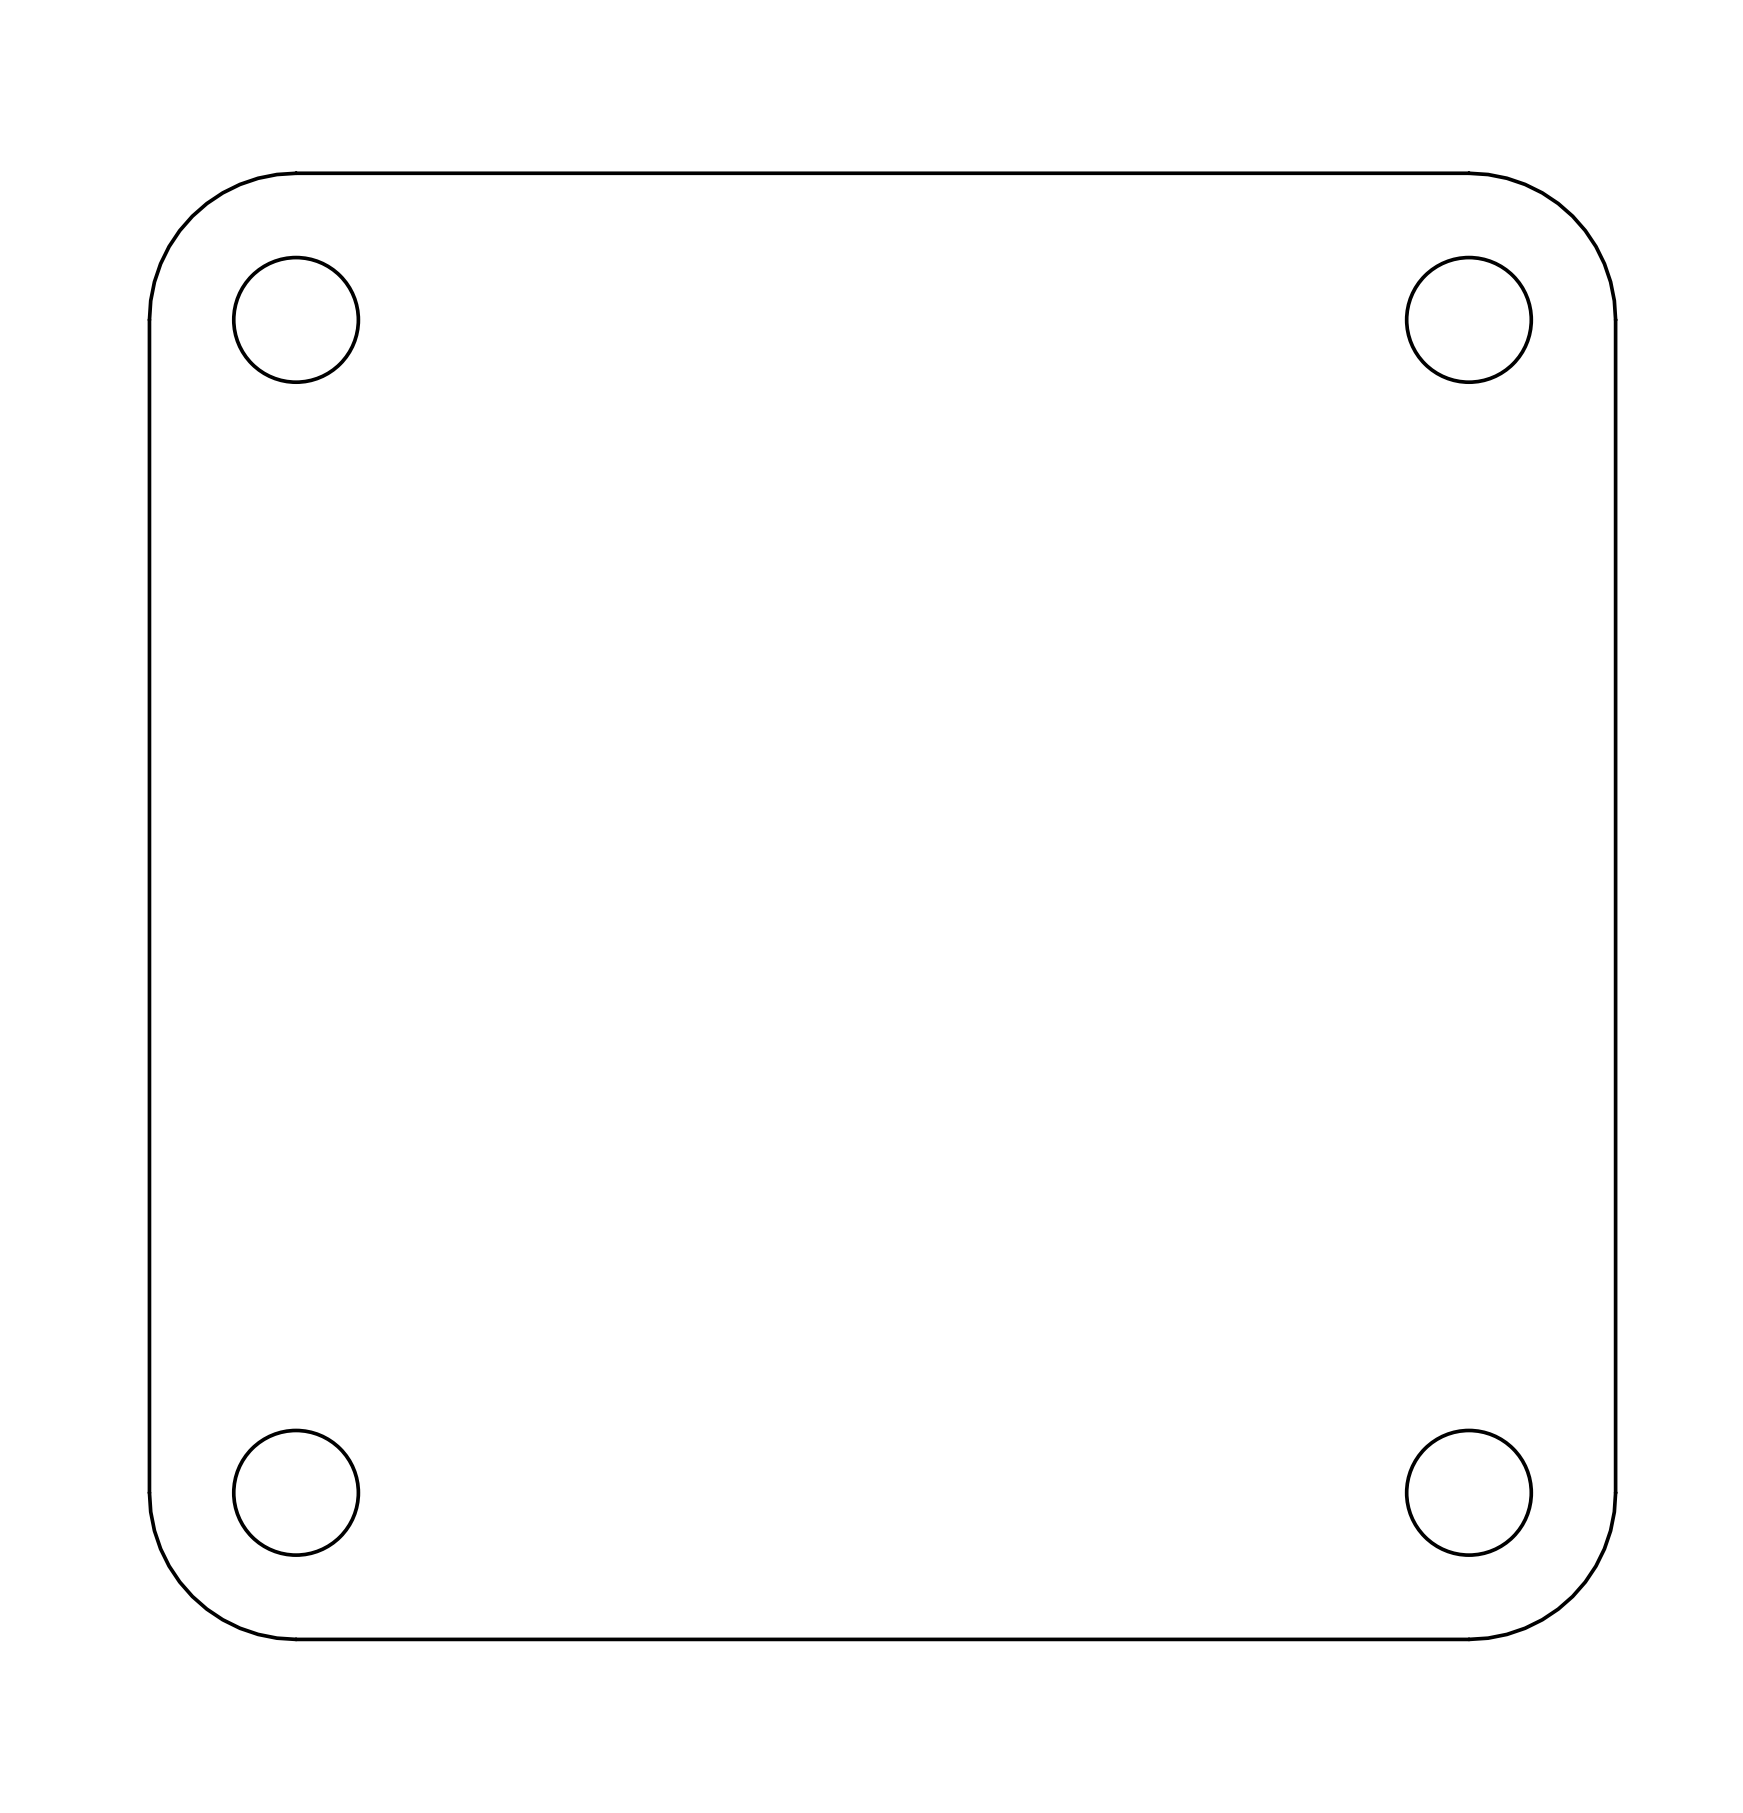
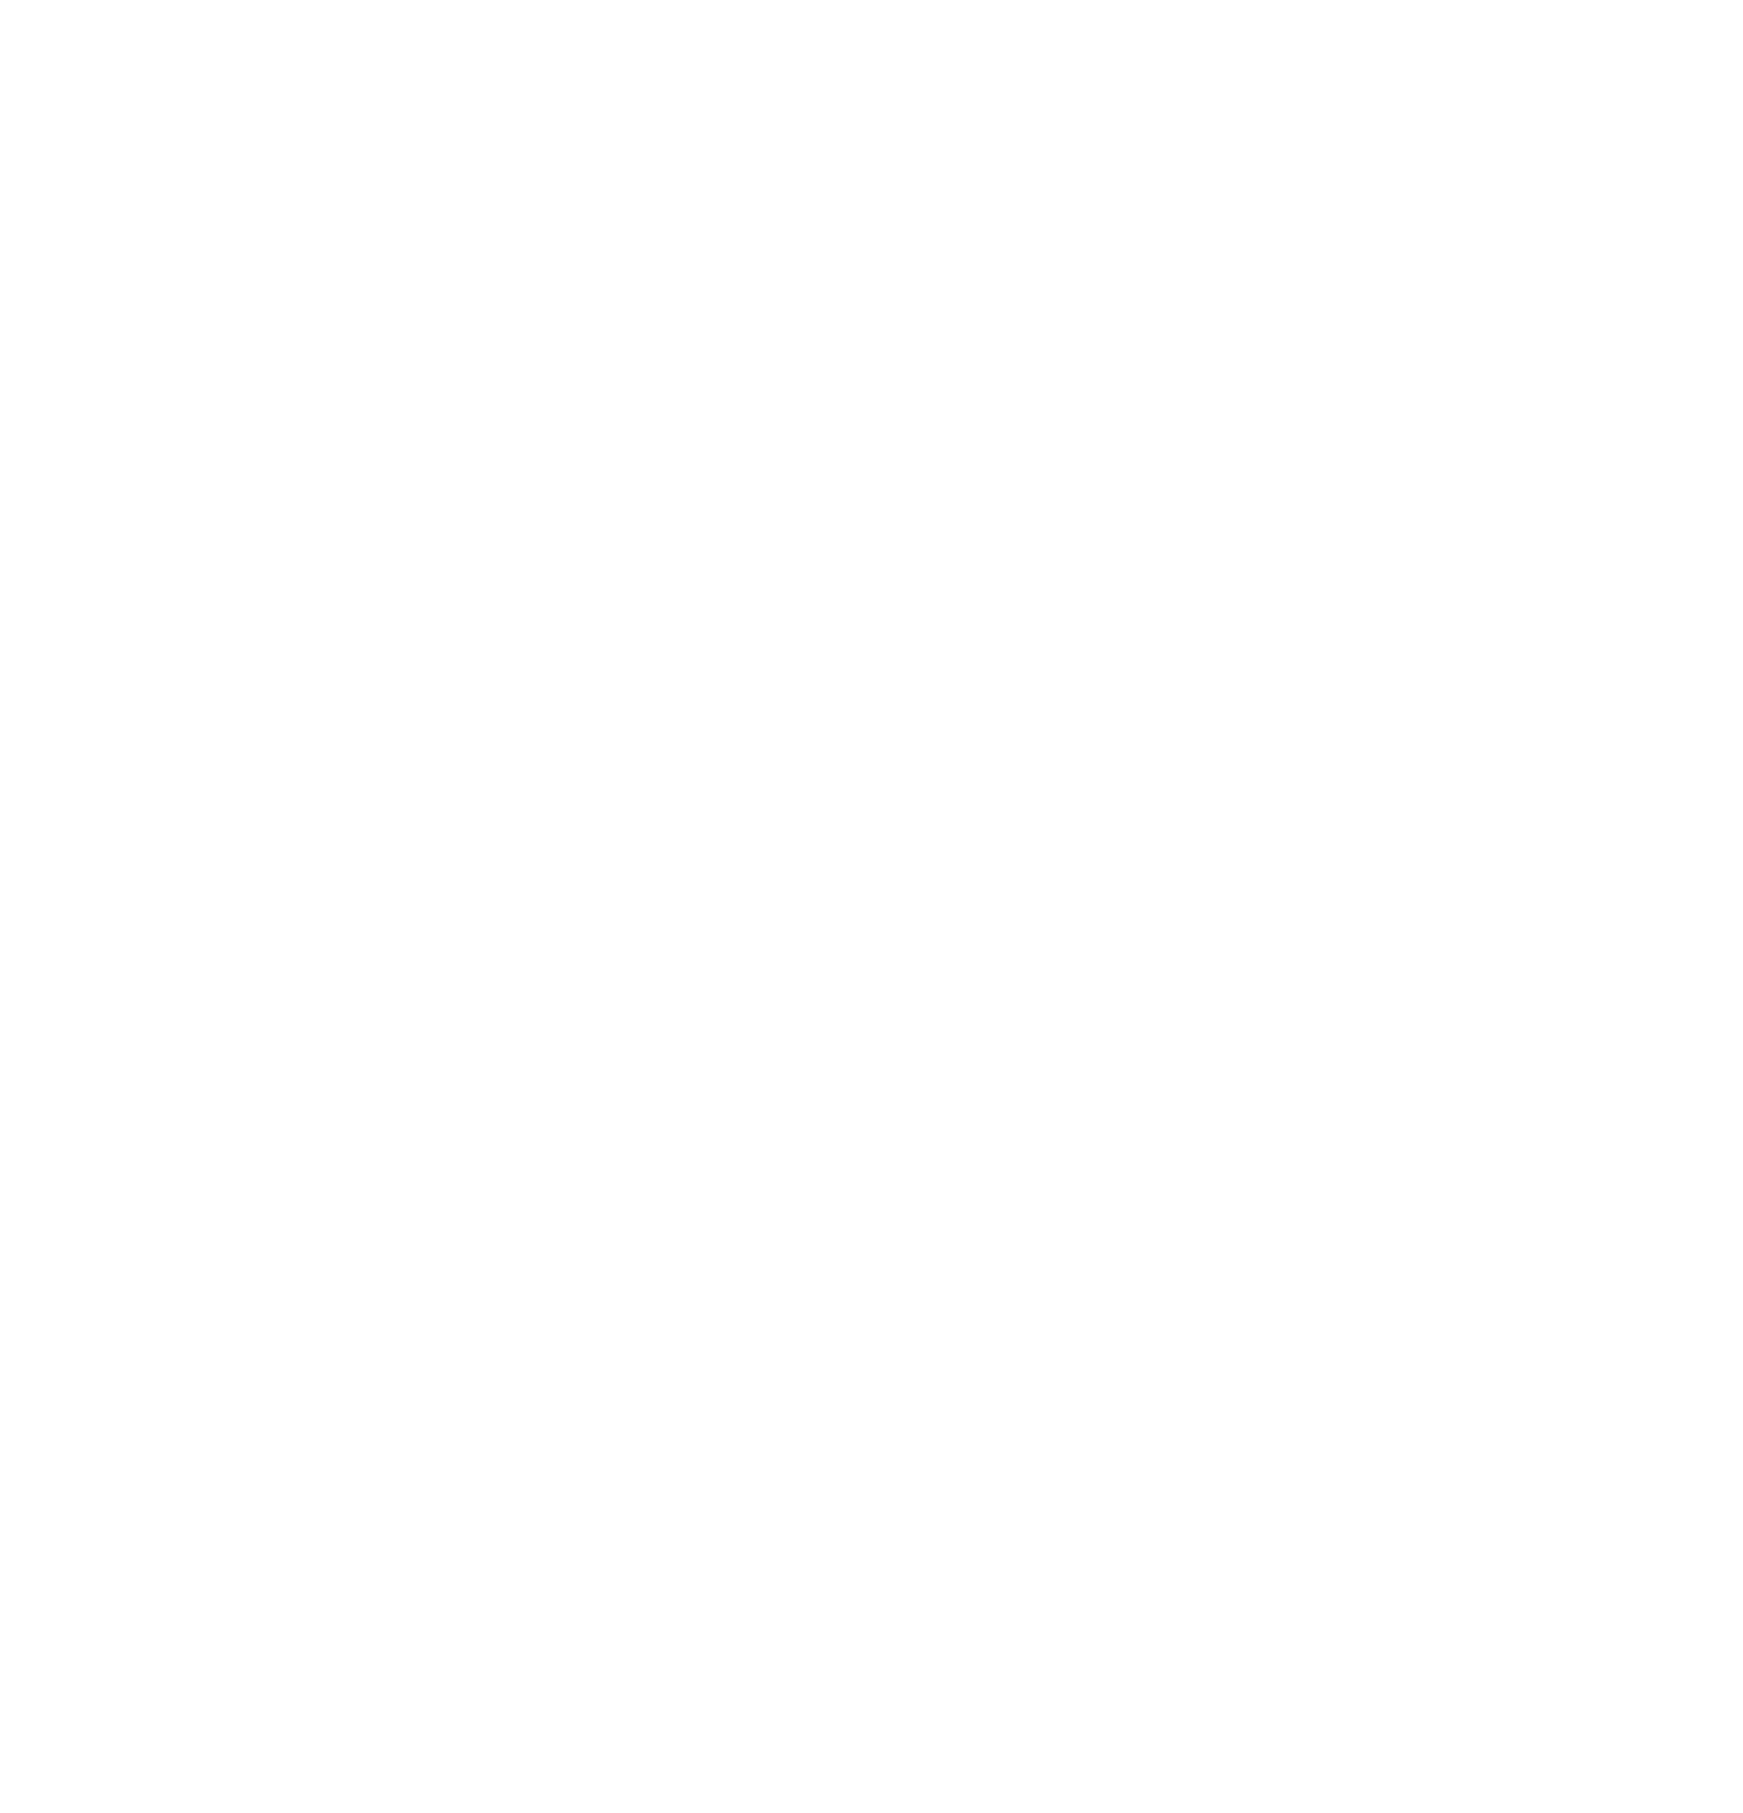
board edge: (1468, 173) (296, 173) (258, 178) (239, 184) (206, 203) (192, 216) (179, 230) (160, 263) (154, 281) (149, 319) (149, 1492) (150, 1511) (160, 1548) (179, 1582) (192, 1596) (206, 1609) (239, 1628) (258, 1634) (296, 1639) (1468, 1639) (1488, 1638) (1525, 1628) (1558, 1609) (1572, 1596) (1595, 1566) (1604, 1548) (1614, 1511) (1615, 1492) (1614, 300) (1604, 263) (1595, 246) (1572, 216) (1558, 203) (1525, 184) (1506, 178) (1468, 173) -> none
round board edge: [231, 255, 361, 385] -> none
round board edge: [1404, 255, 1534, 385] -> none
round board edge: [231, 1428, 361, 1557] -> none
round board edge: [1404, 1428, 1534, 1557] -> none

